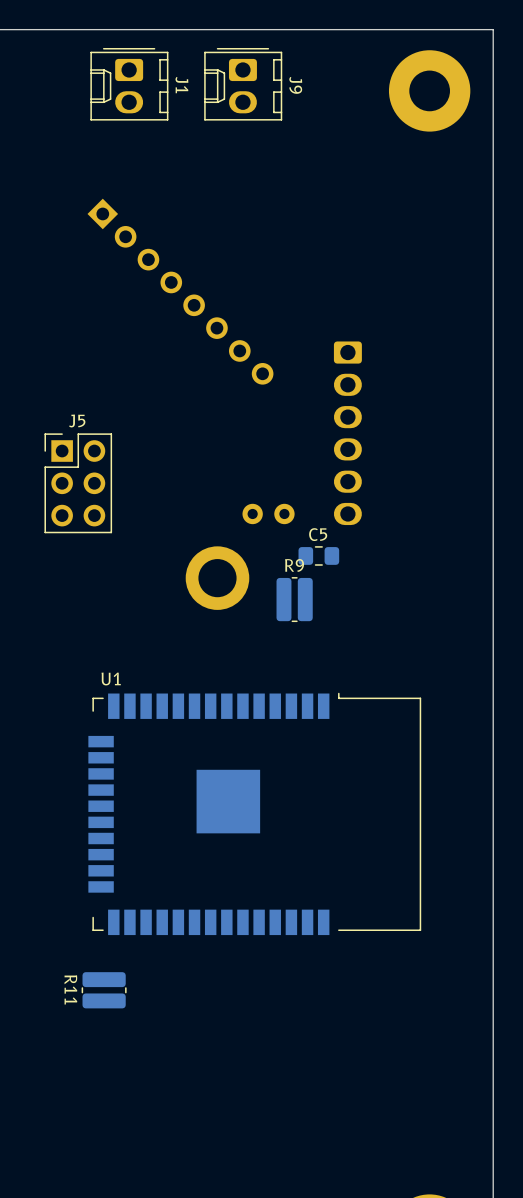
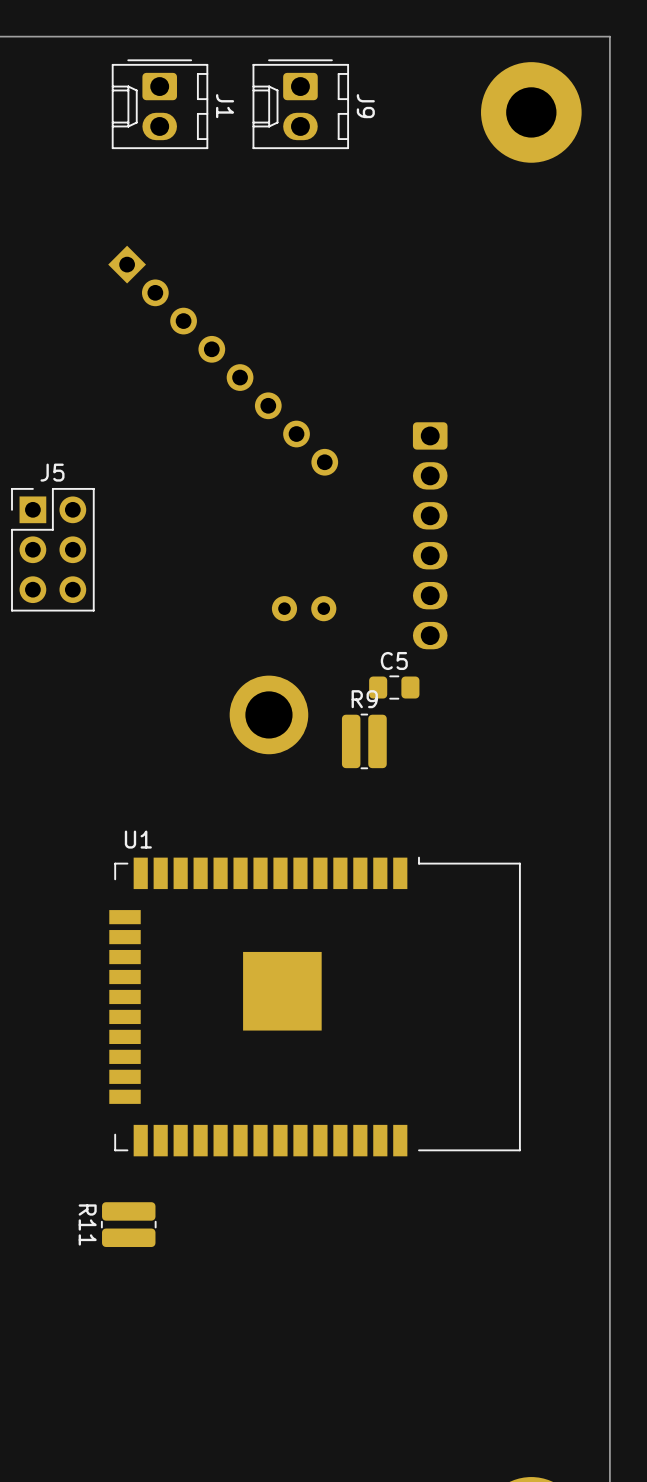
J5 position: (78, 483) -> (52, 549)
part position: (268, 513) -> (304, 608)

